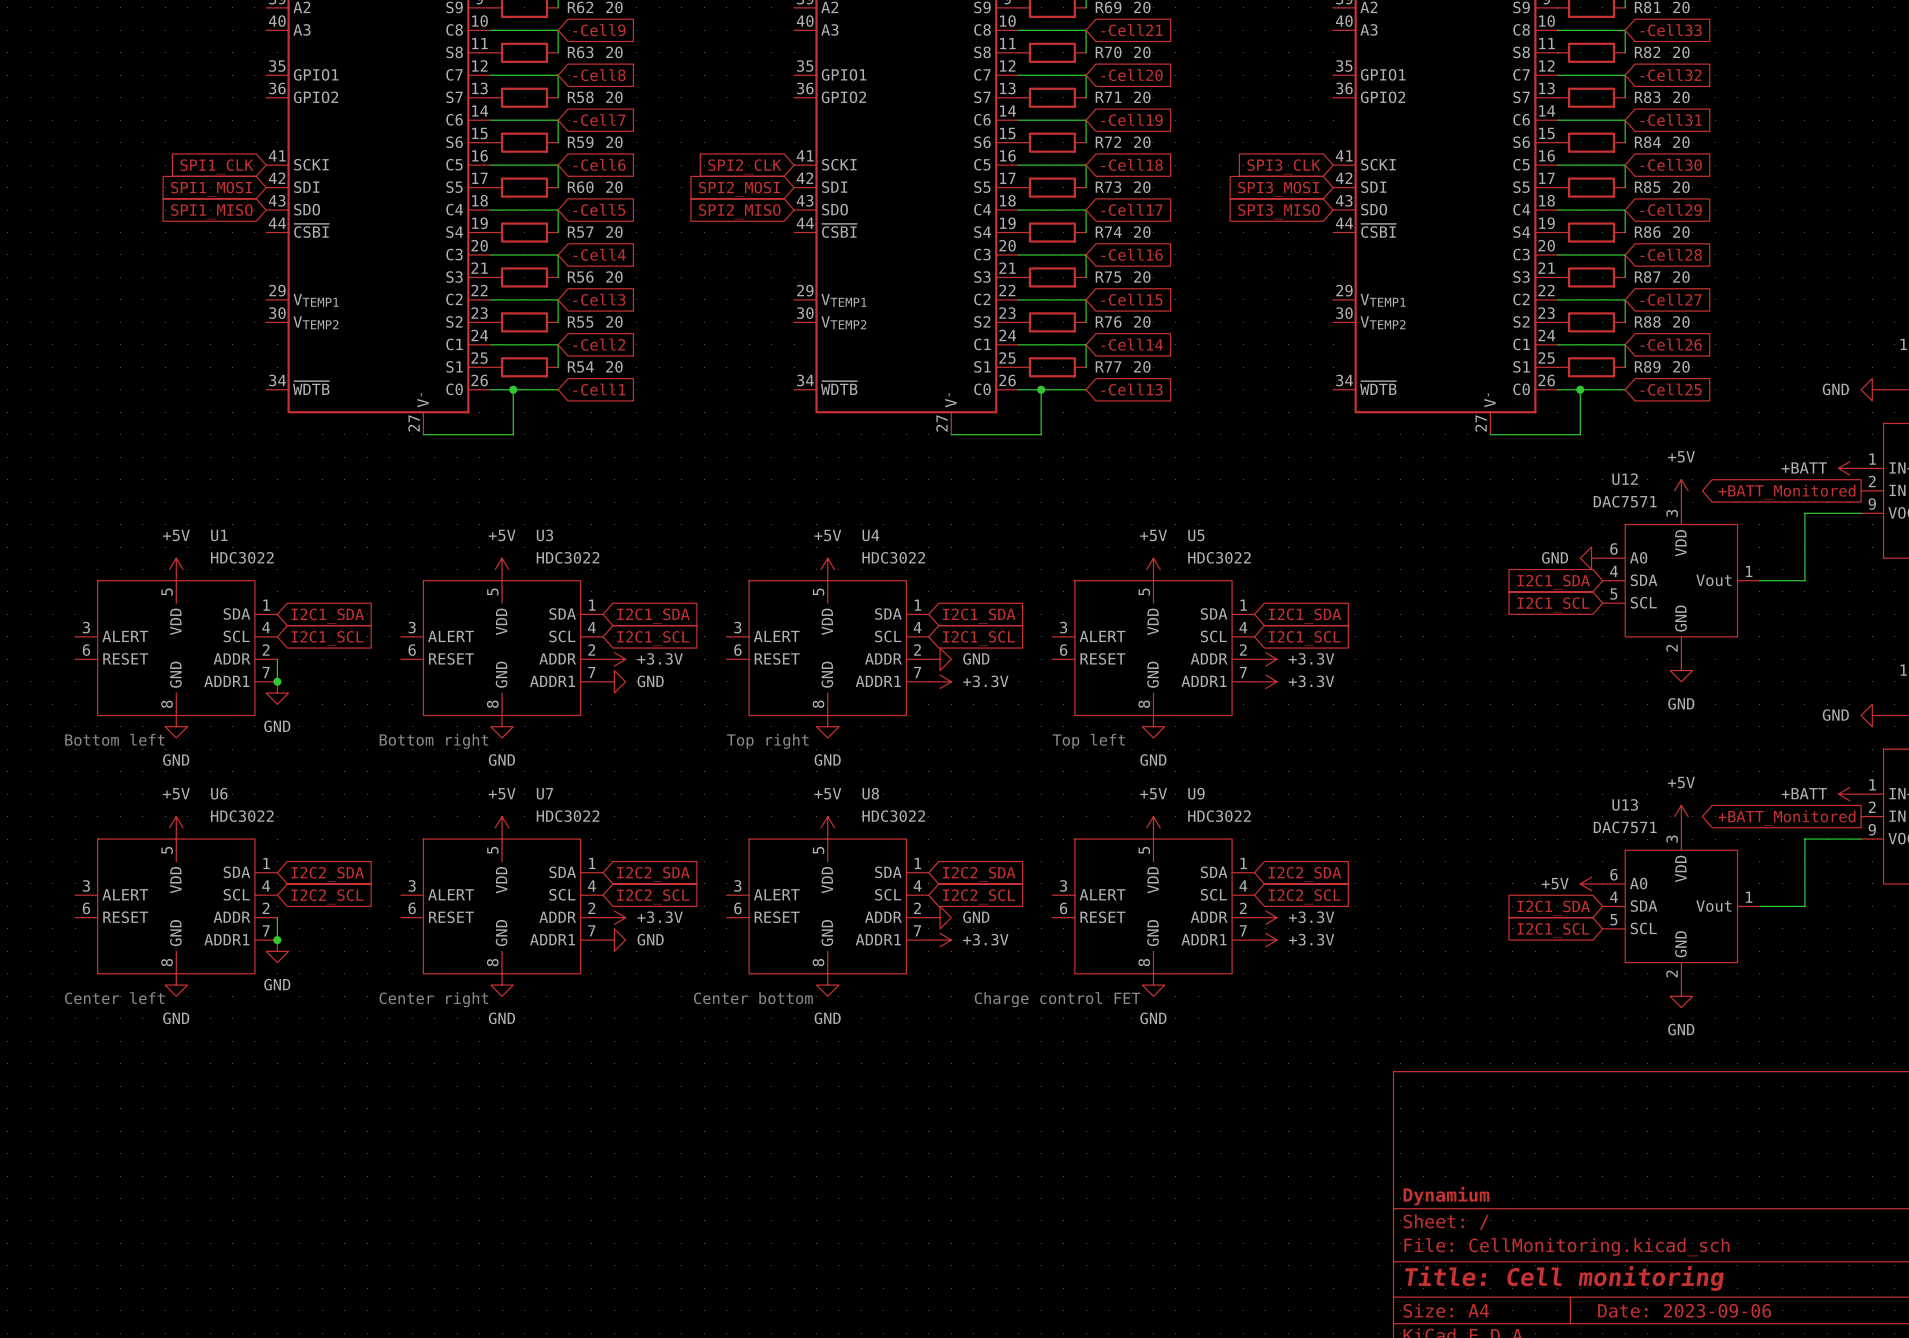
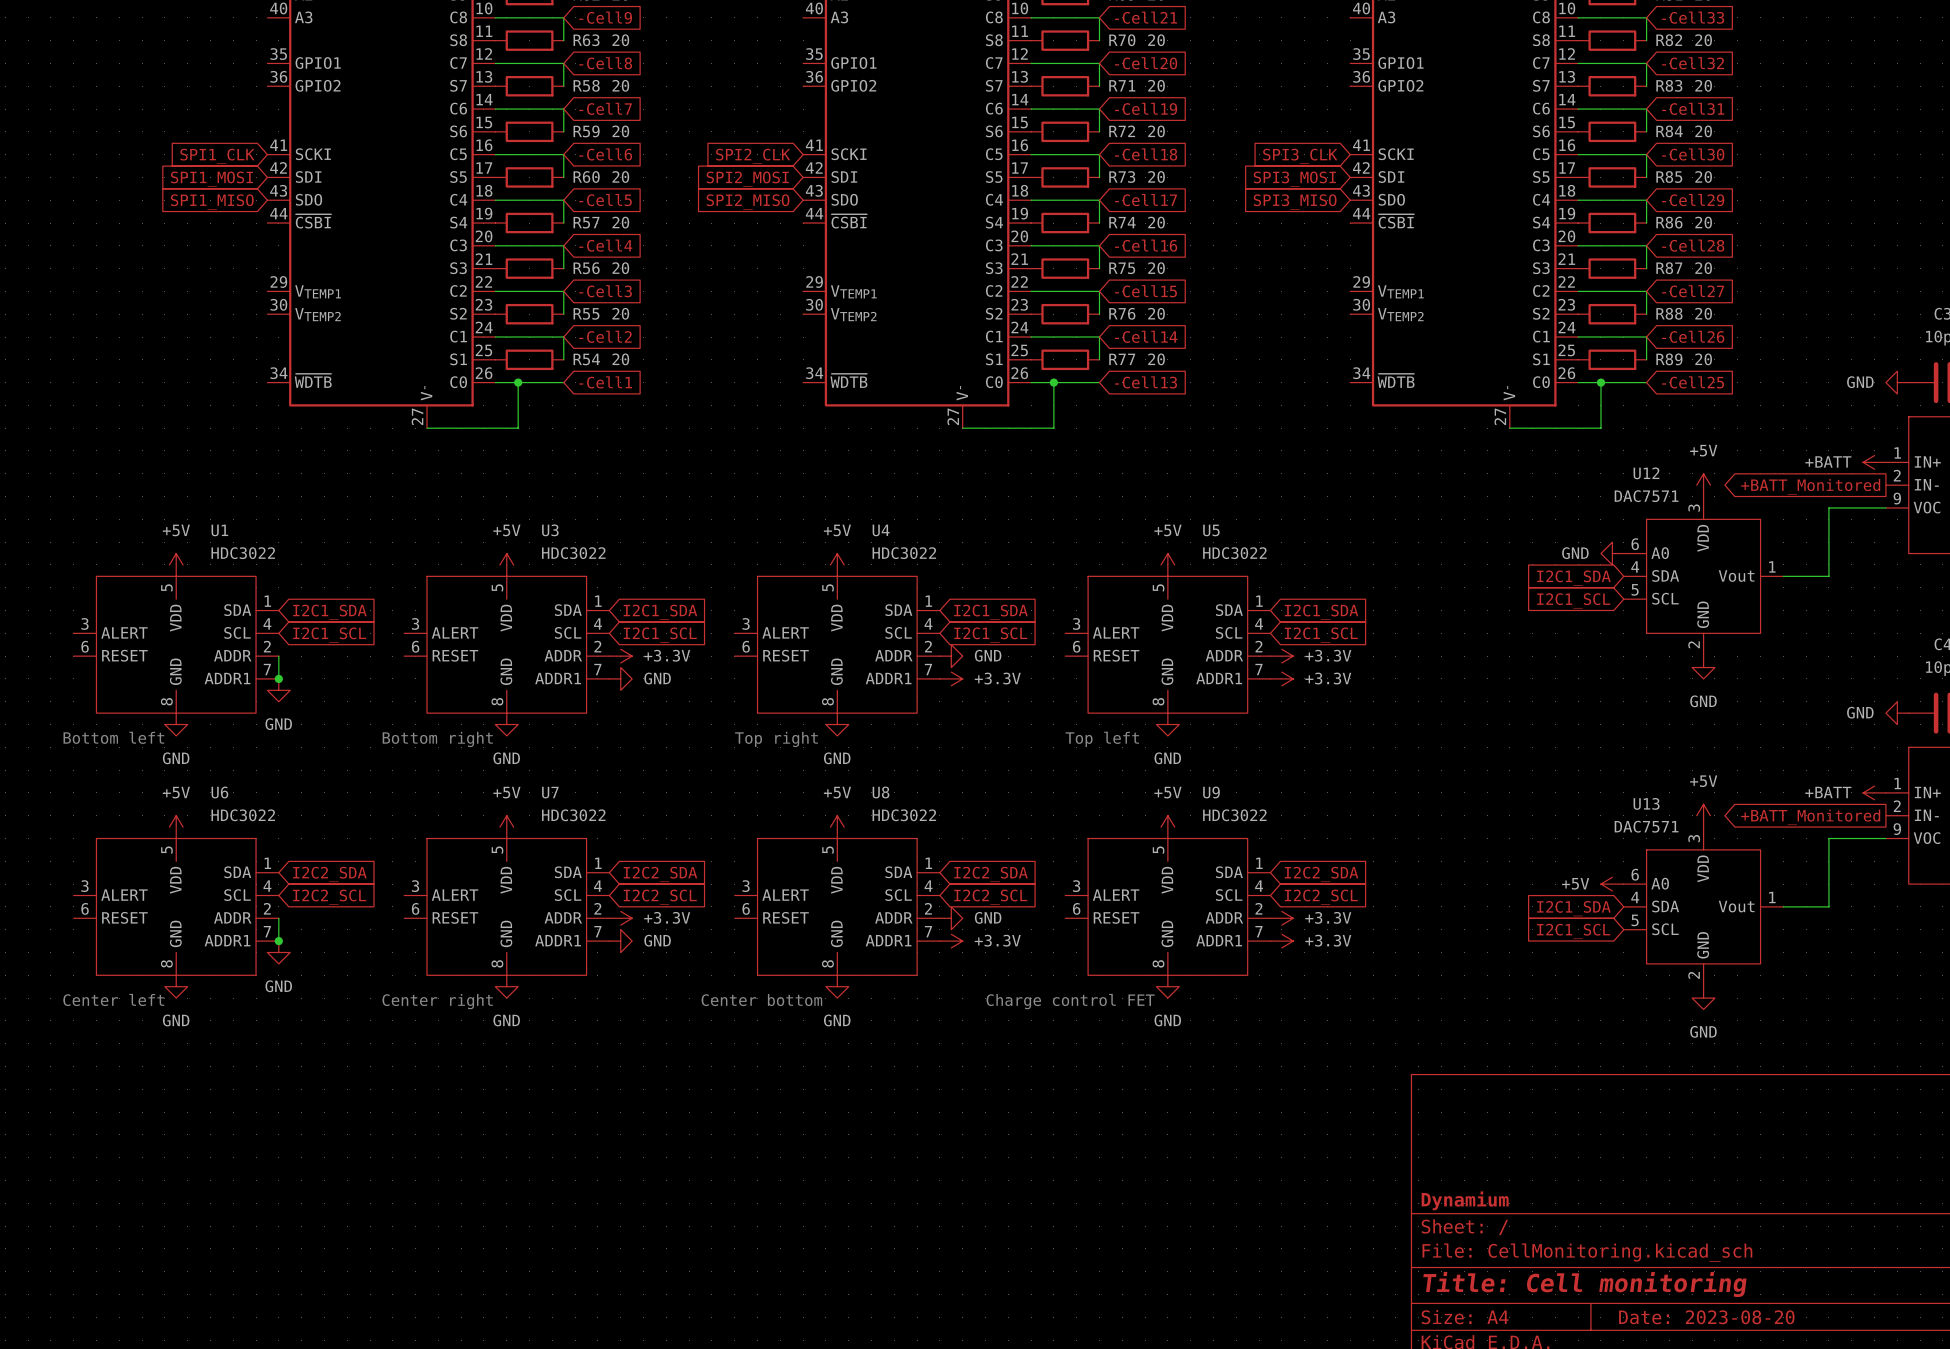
title block: Date: 2023-09-06 (1684, 1310) -> Date: 2023-08-20 (1706, 1317)

